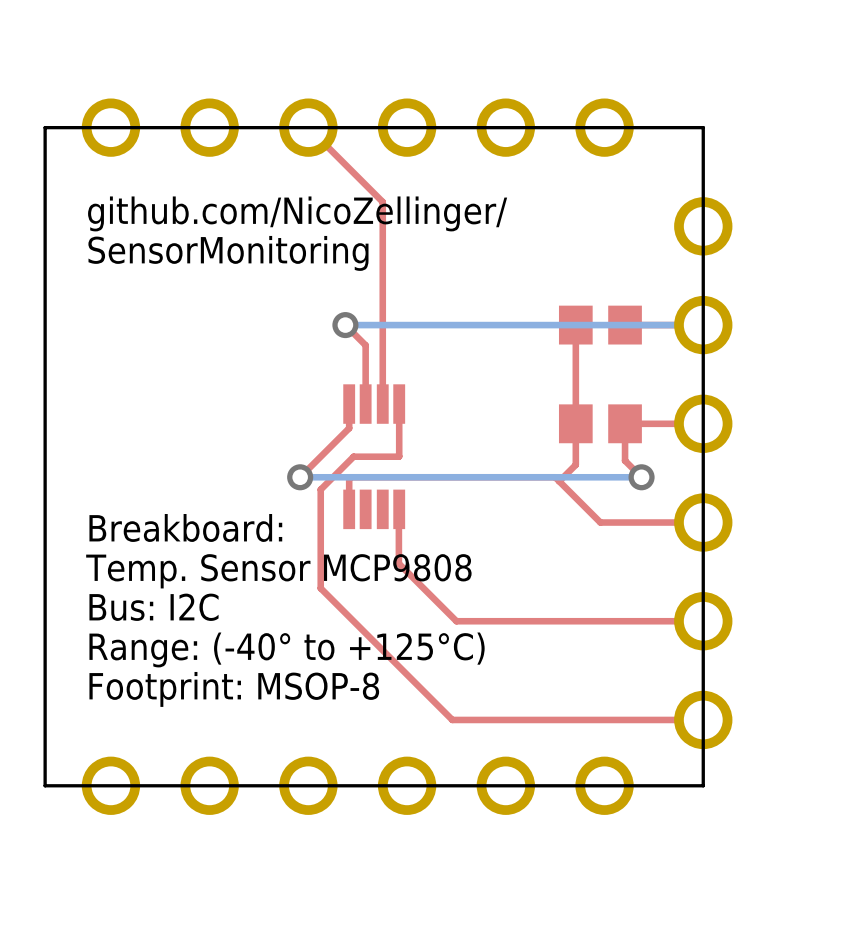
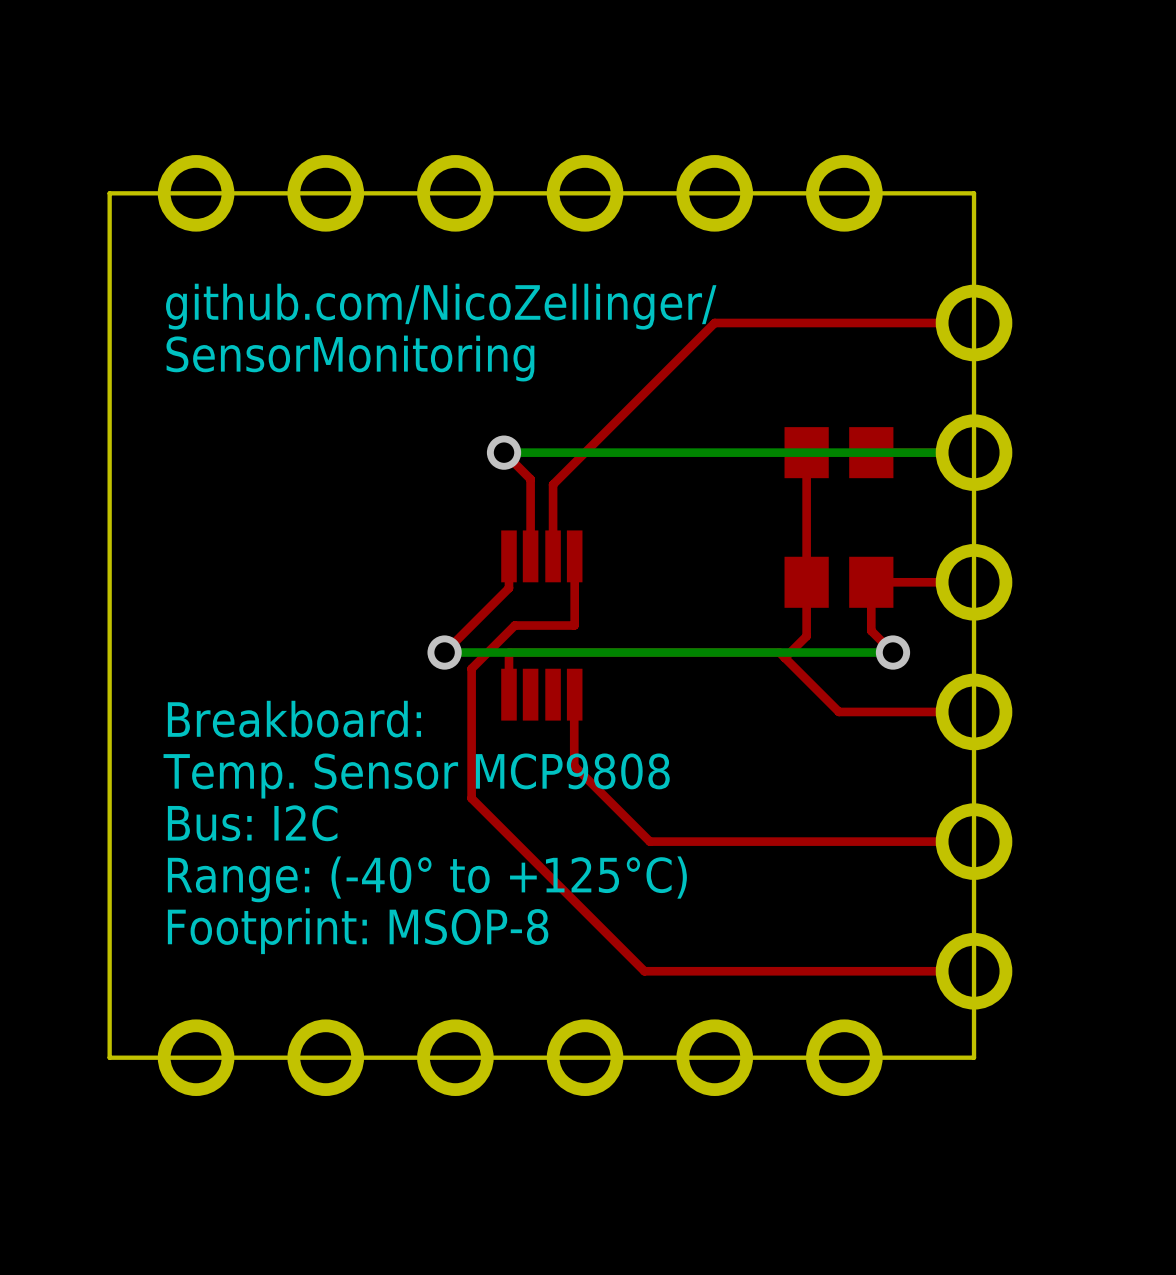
top track: (308, 127) (382, 202) (382, 349) -> (974, 322) (714, 322) (553, 484)

